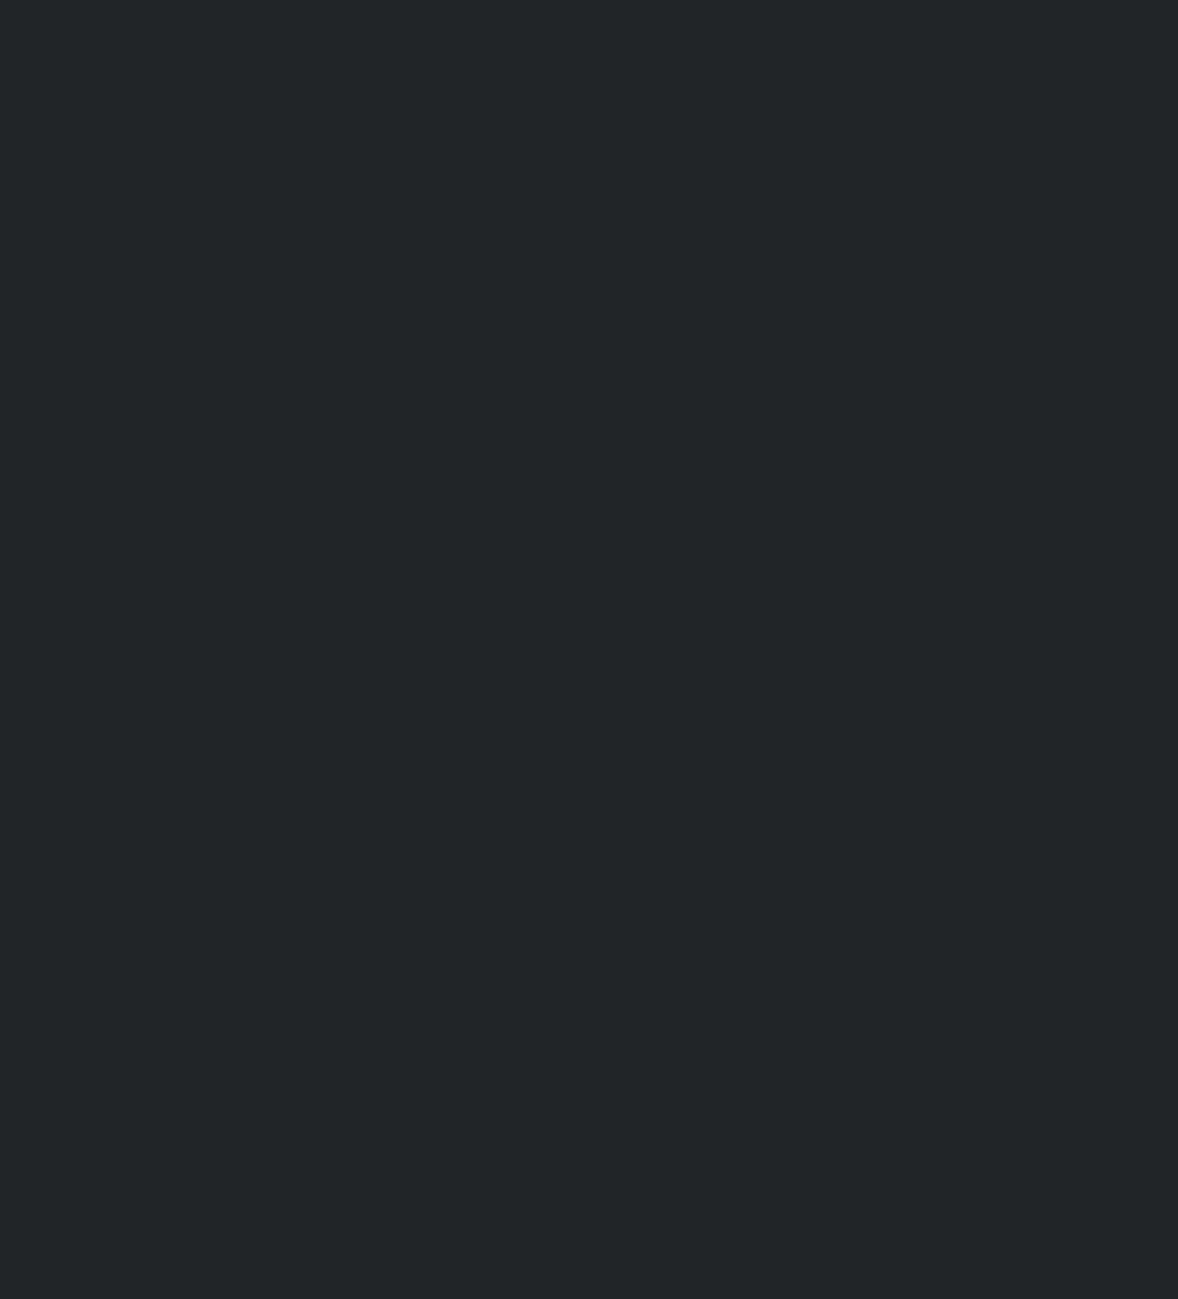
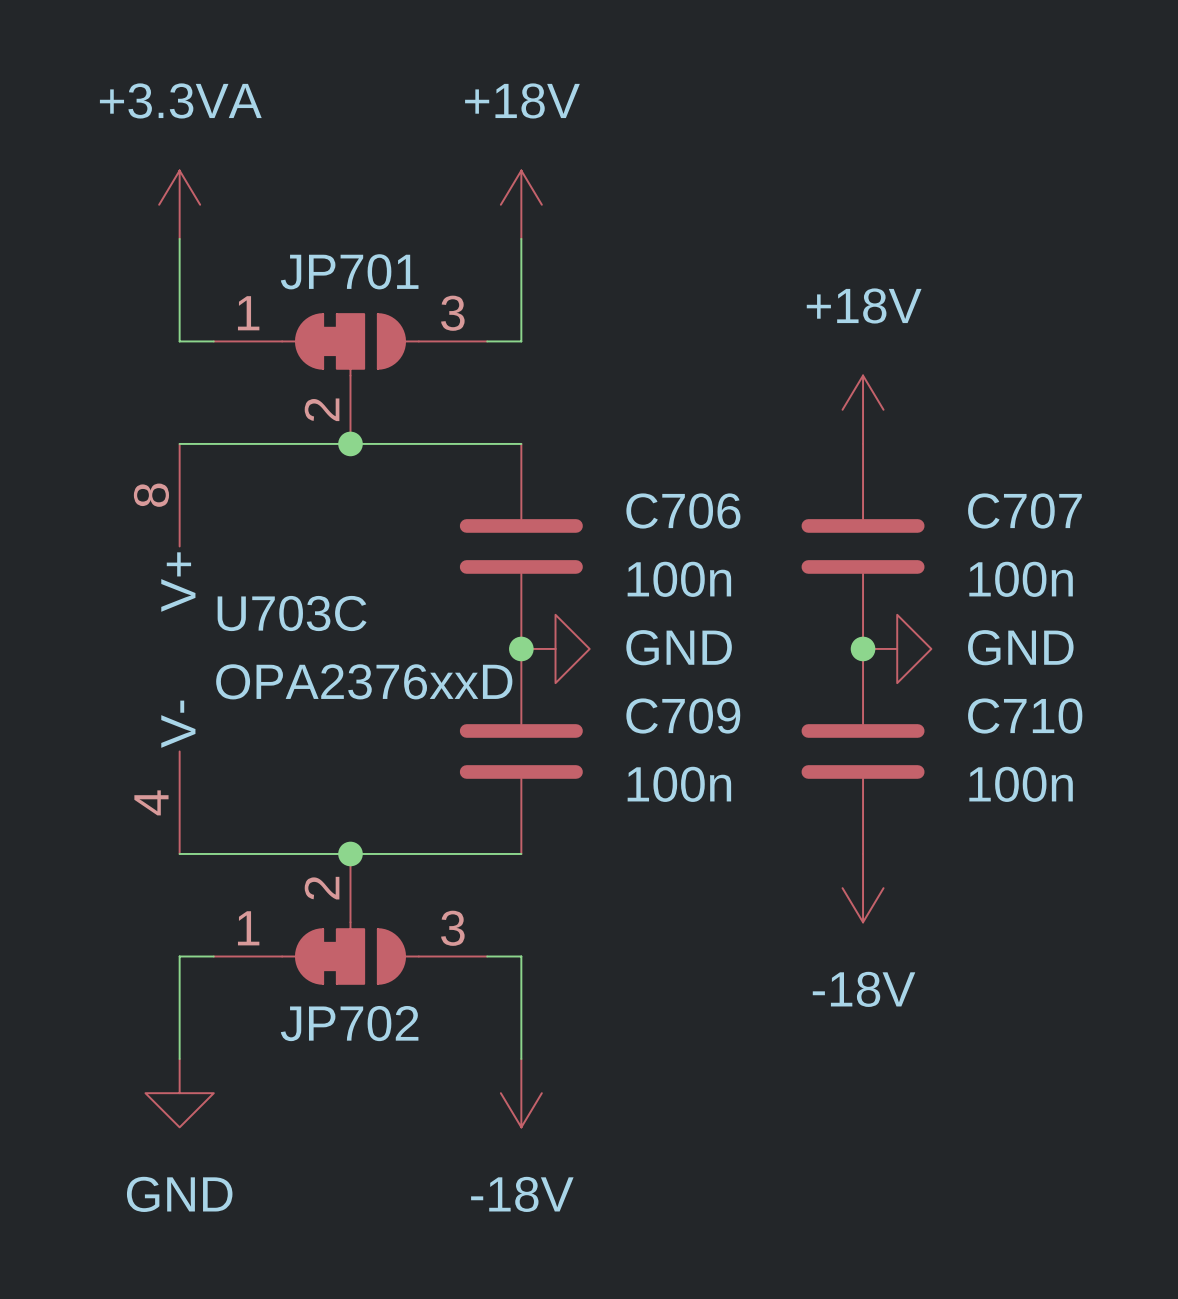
power symbol: none -> +3.3VA (179, 204)
power symbol: none -> +18V (521, 204)
wire: none -> (179, 238) (179, 341) (213, 341)
wire: none -> (521, 238) (521, 341) (487, 341)
JP701: none -> (350, 379)
power symbol: none -> +18V (863, 409)
wire: none -> (179, 443) (521, 443)
junction: none -> (350, 443)
C706: none -> 100n (521, 546)
C707: none -> 100n (863, 546)
U703C: none -> OPA2376xxD (179, 648)
junction: none -> (521, 648)
power symbol: none -> GND (555, 648)
junction: none -> (863, 648)
power symbol: none -> GND (897, 648)
C709: none -> 100n (521, 751)
C710: none -> 100n (863, 751)
wire: none -> (179, 853) (521, 853)
junction: none -> (350, 853)
power symbol: none -> -18V (863, 888)
JP702: none -> (350, 918)
wire: none -> (213, 956) (179, 956) (179, 1059)
wire: none -> (487, 956) (521, 956) (521, 1059)
power symbol: none -> GND (179, 1093)
power symbol: none -> -18V (521, 1093)

